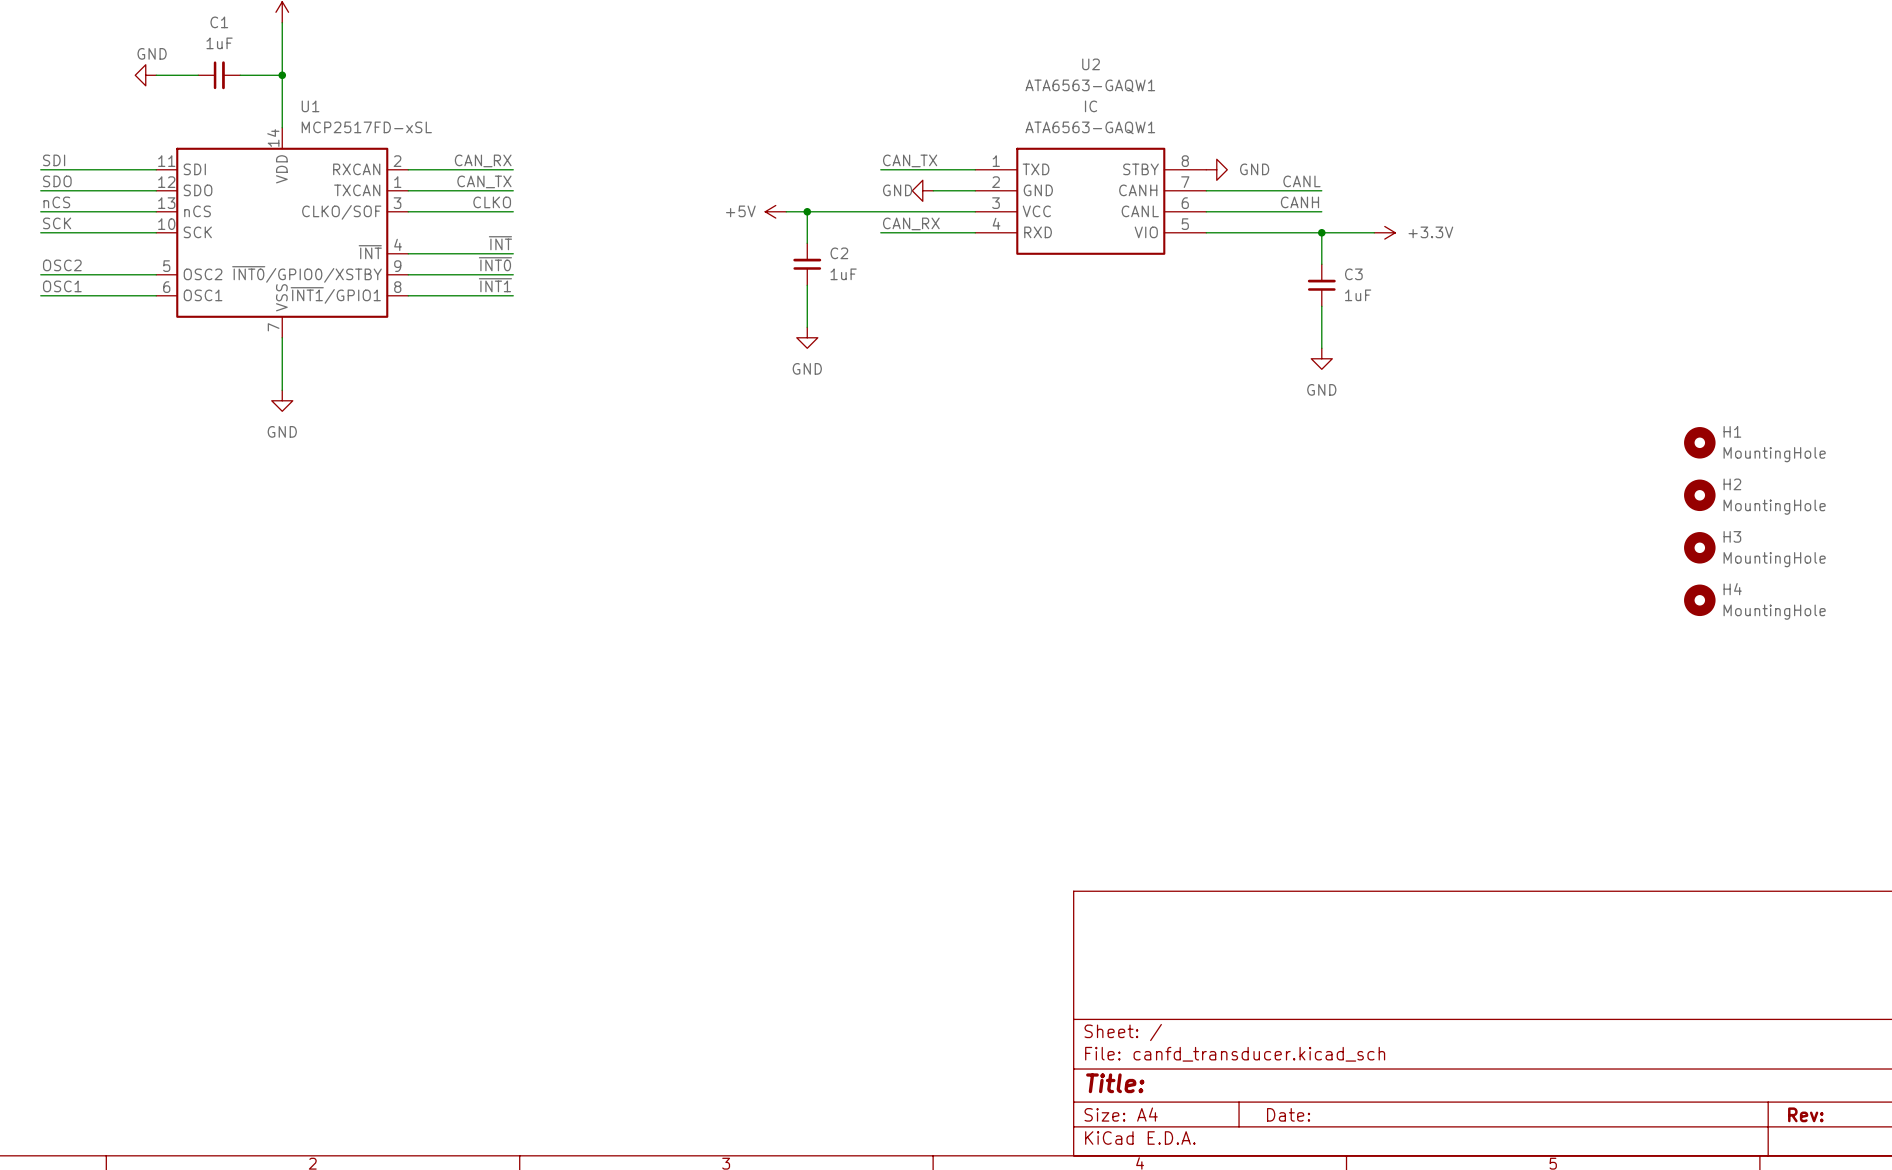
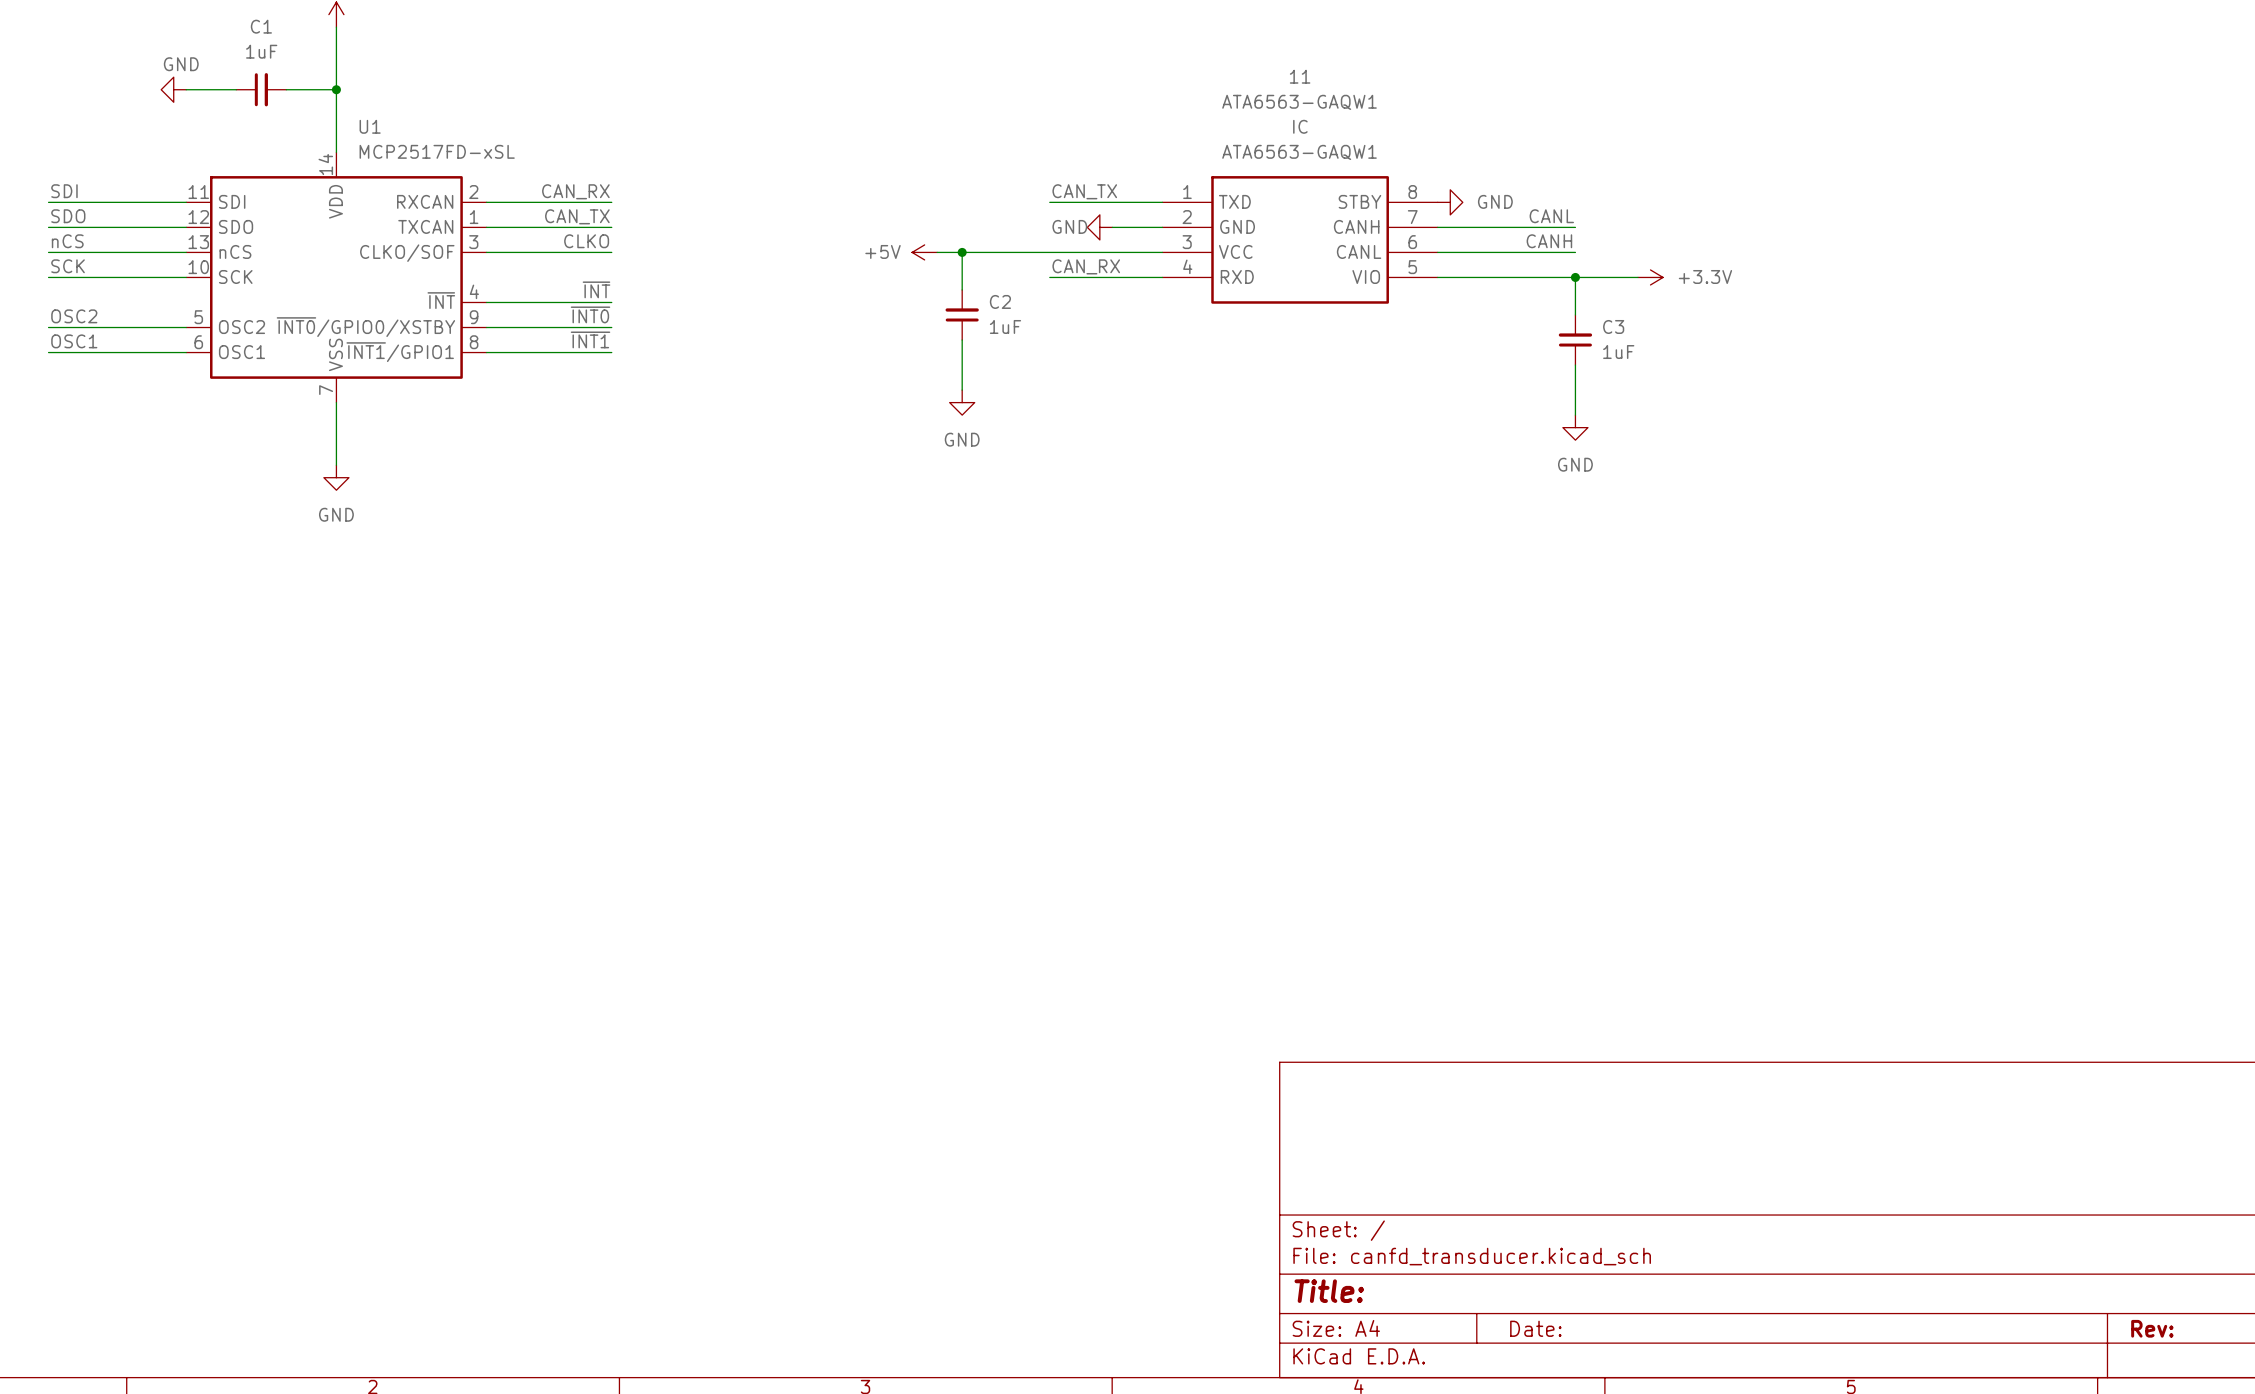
U2 name: U2 (1091, 64) -> 11 (1300, 76)
H1: MountingHole (1699, 442) -> none
H2: MountingHole (1699, 495) -> none
H3: MountingHole (1699, 547) -> none
H4: MountingHole (1699, 600) -> none

